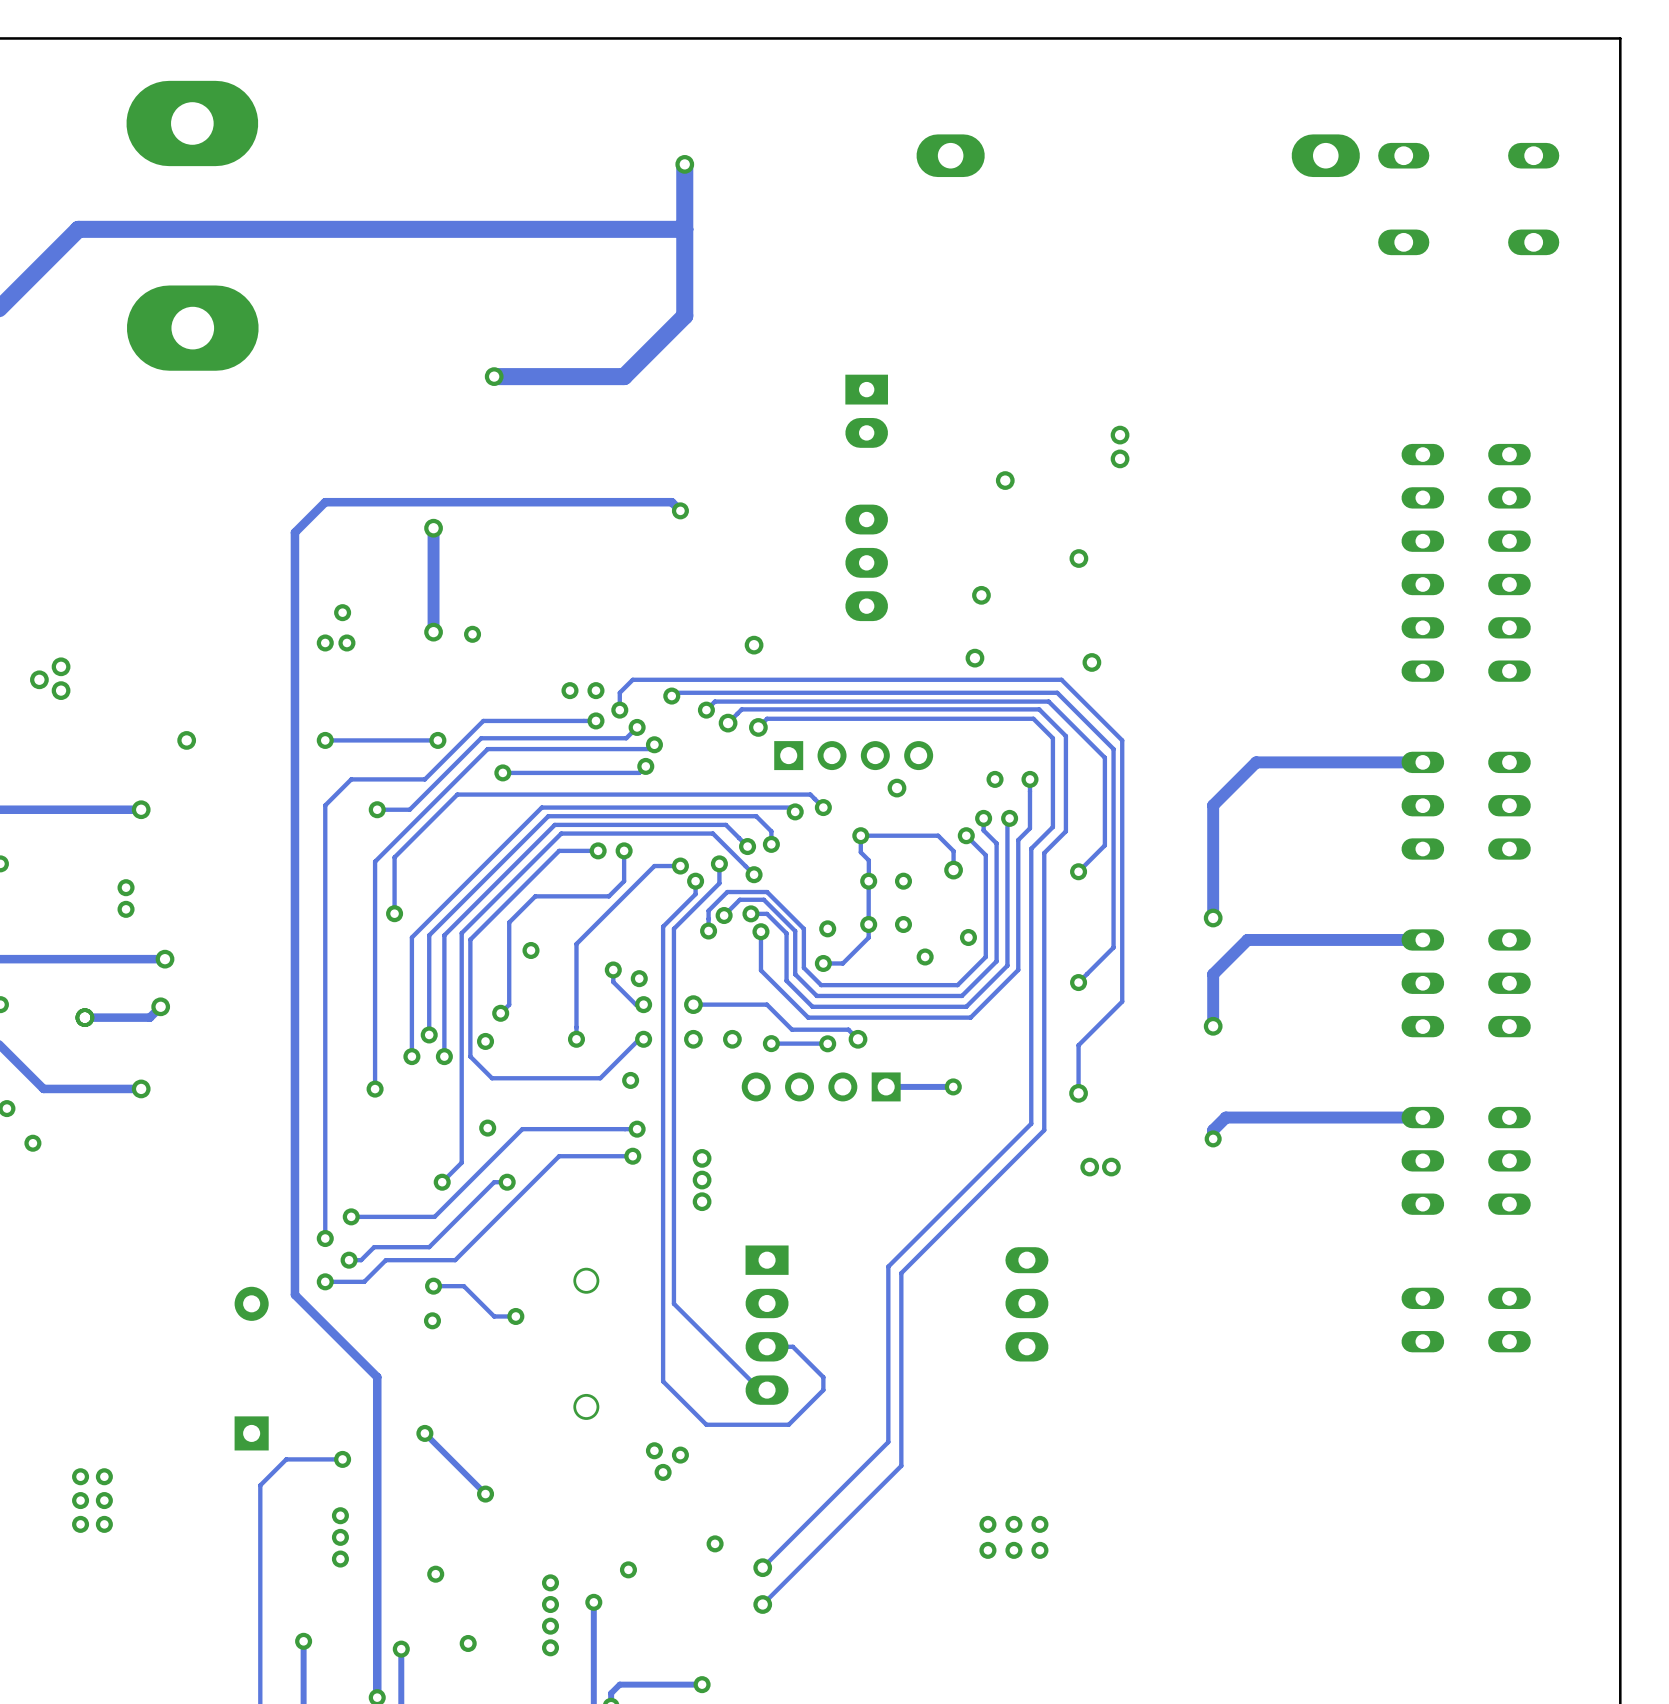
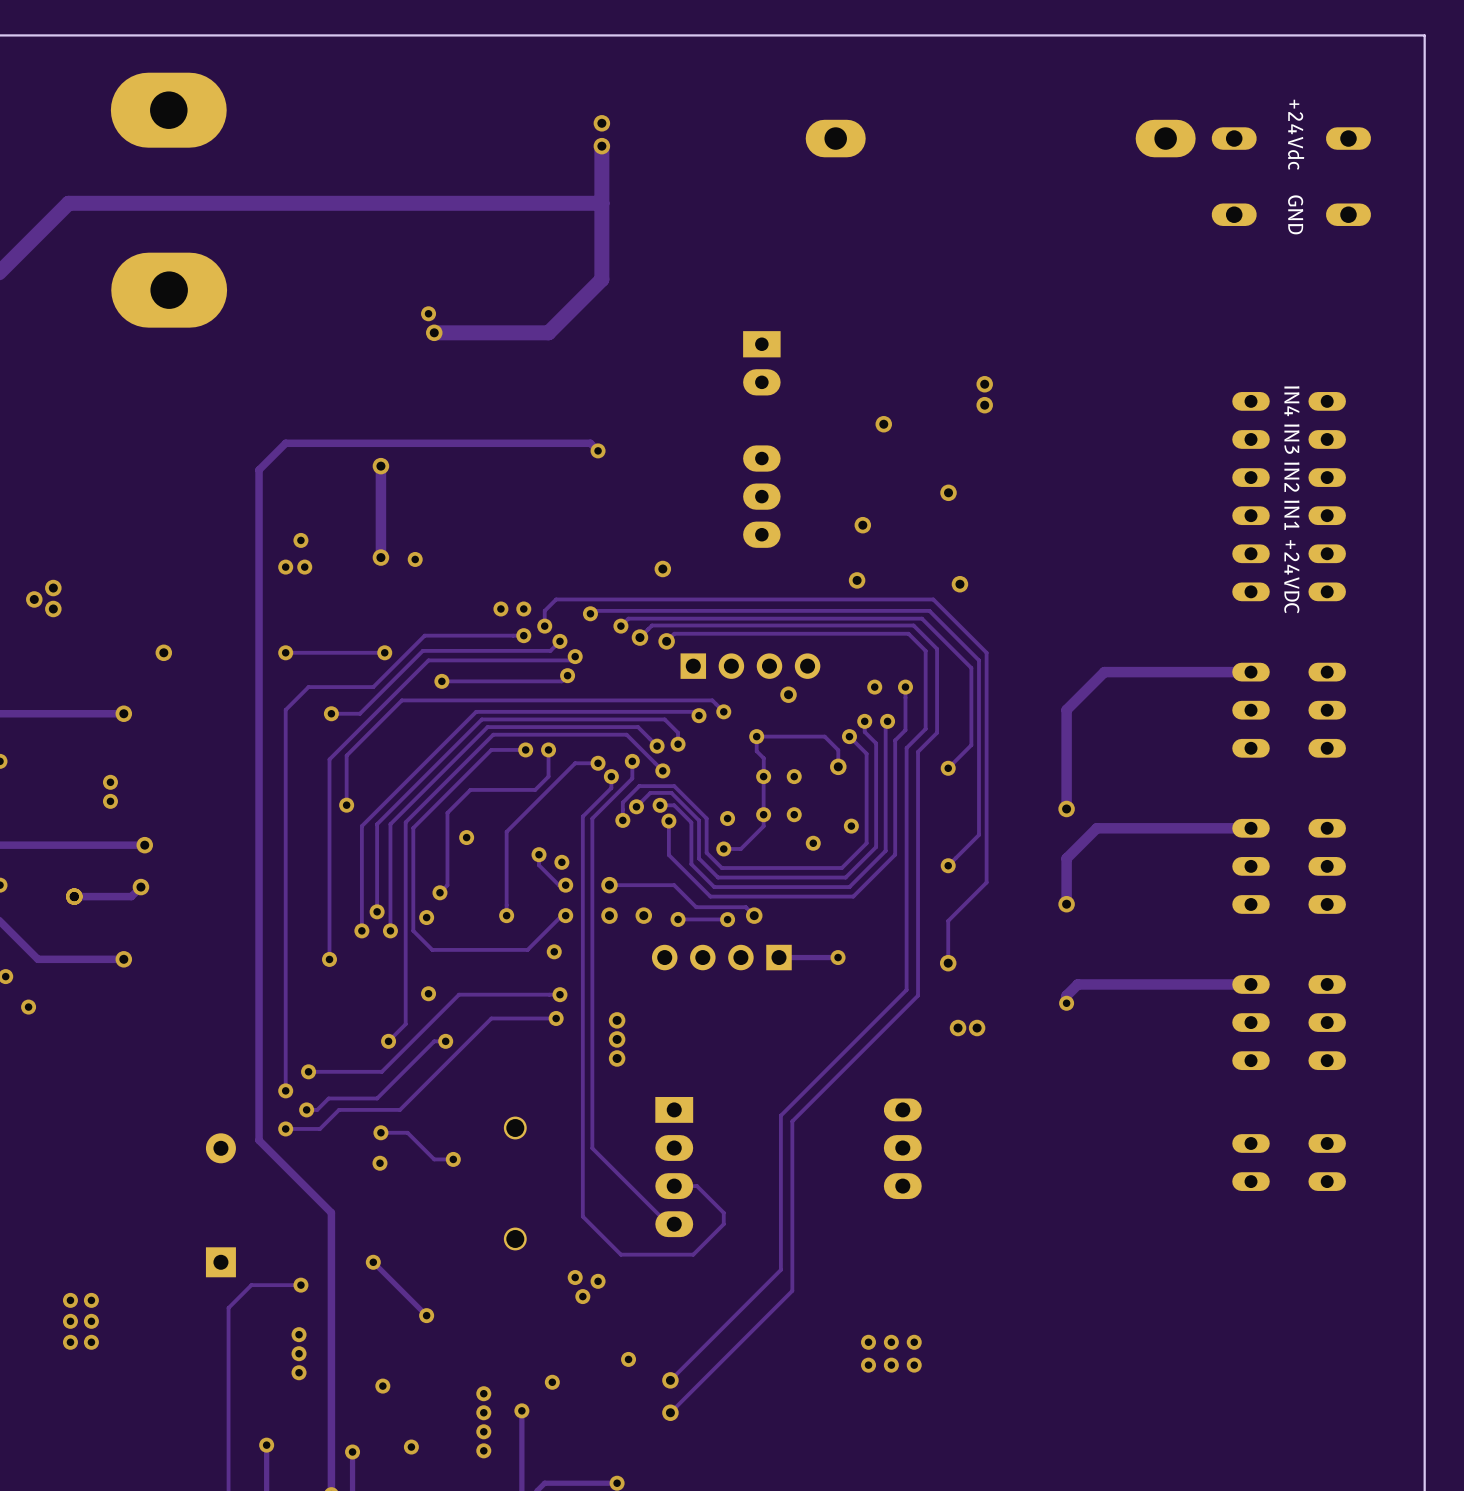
via: none -> (601, 123)
text: none -> +24Vdc (1296, 134)
text: none -> GND (1295, 214)
via: none -> (428, 313)
text: none -> IN4 (1291, 401)
text: none -> IN3 (1291, 439)
text: none -> IN2 (1291, 477)
text: none -> IN1 (1291, 515)
text: none -> +24VDC (1291, 576)

